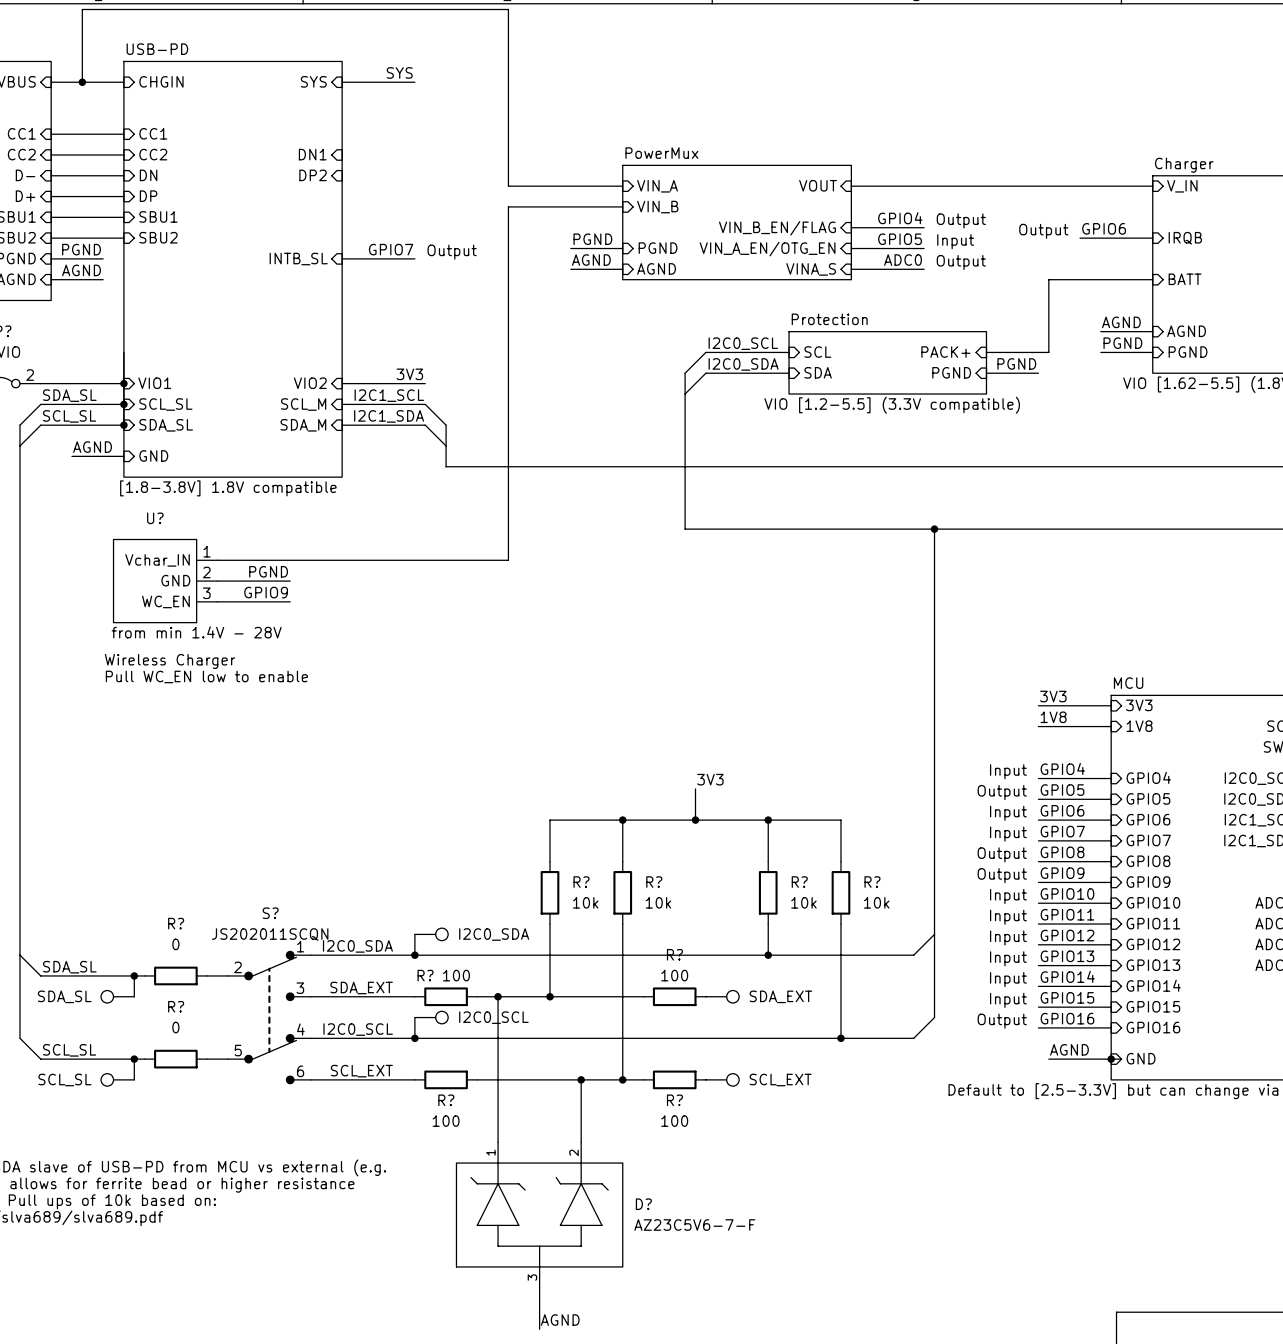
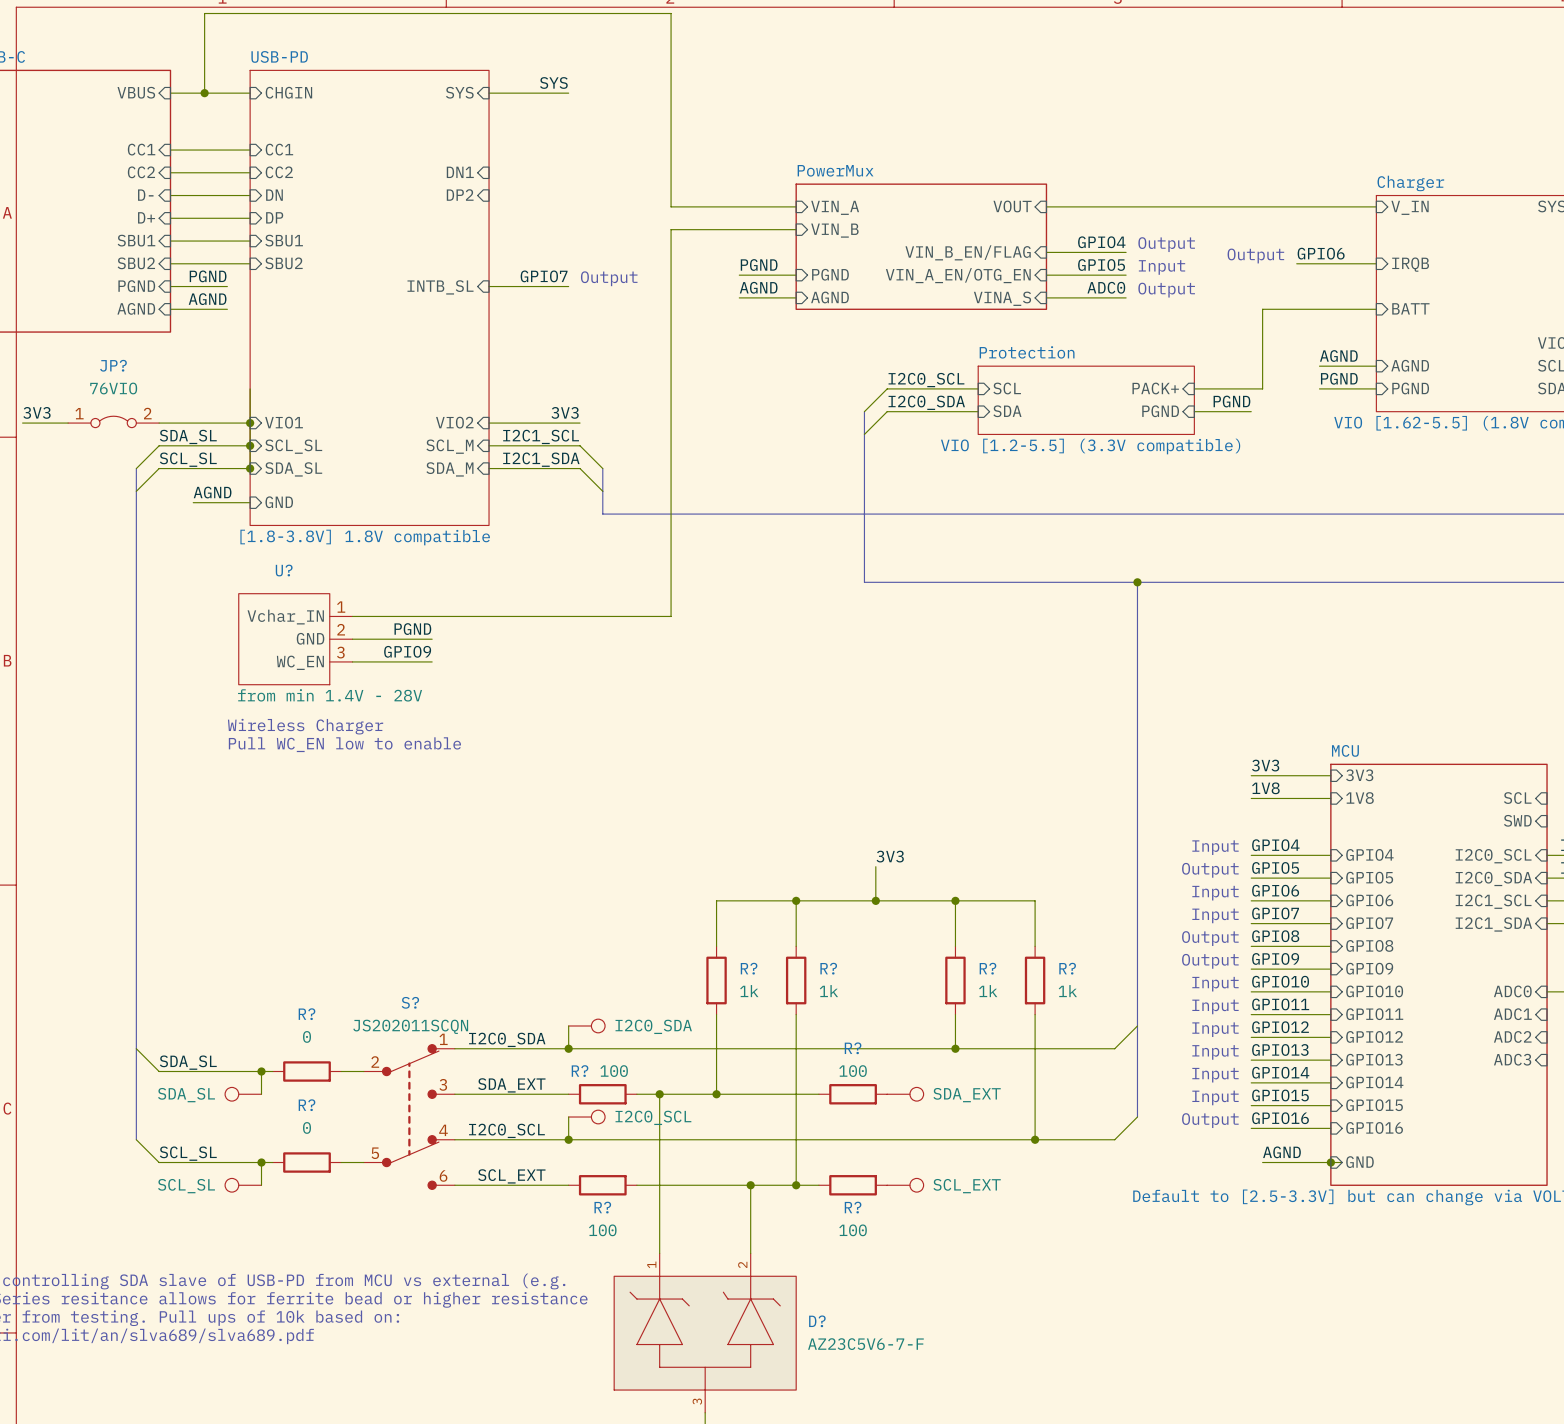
R? value: 10k (585, 902) -> 1k (749, 991)
R? value: 10k (658, 902) -> 1k (828, 991)
R? value: 10k (803, 902) -> 1k (988, 991)
R? value: 10k (876, 902) -> 1k (1067, 991)

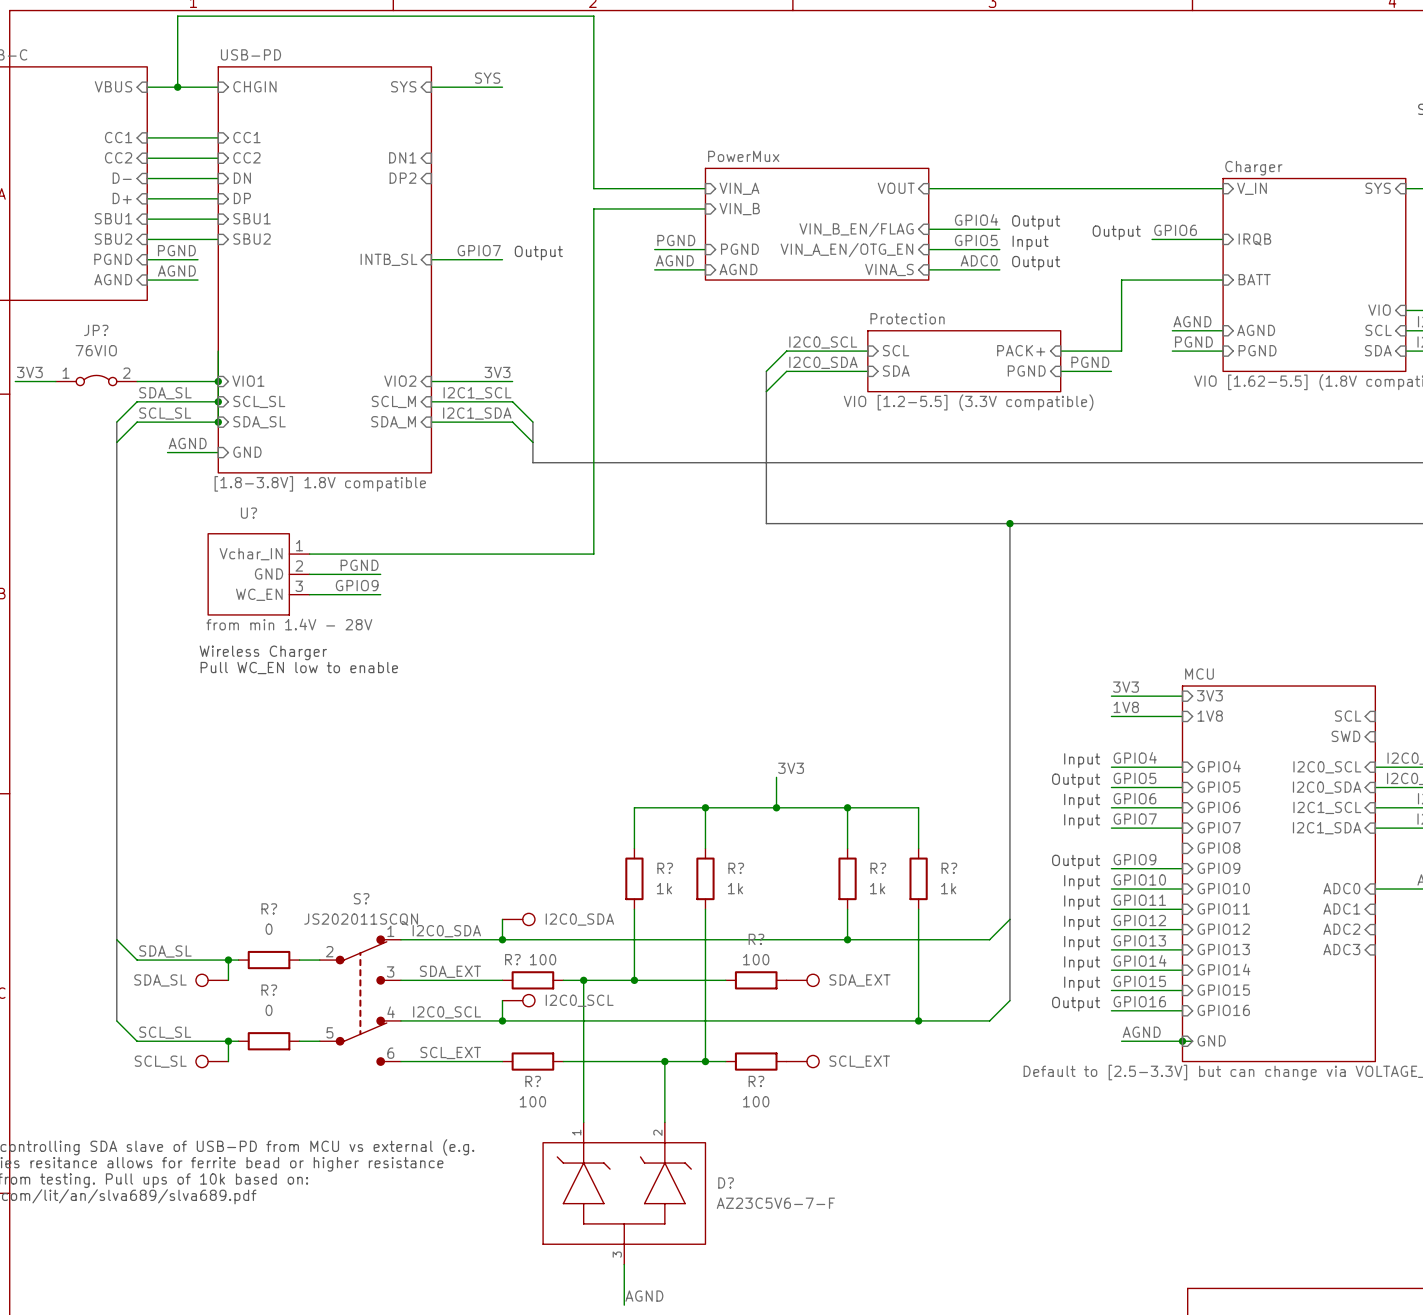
label: GPIO8 (1275, 936) -> none
text: Output (1210, 938) -> none
wire: (1251, 946) (1330, 946) -> none

